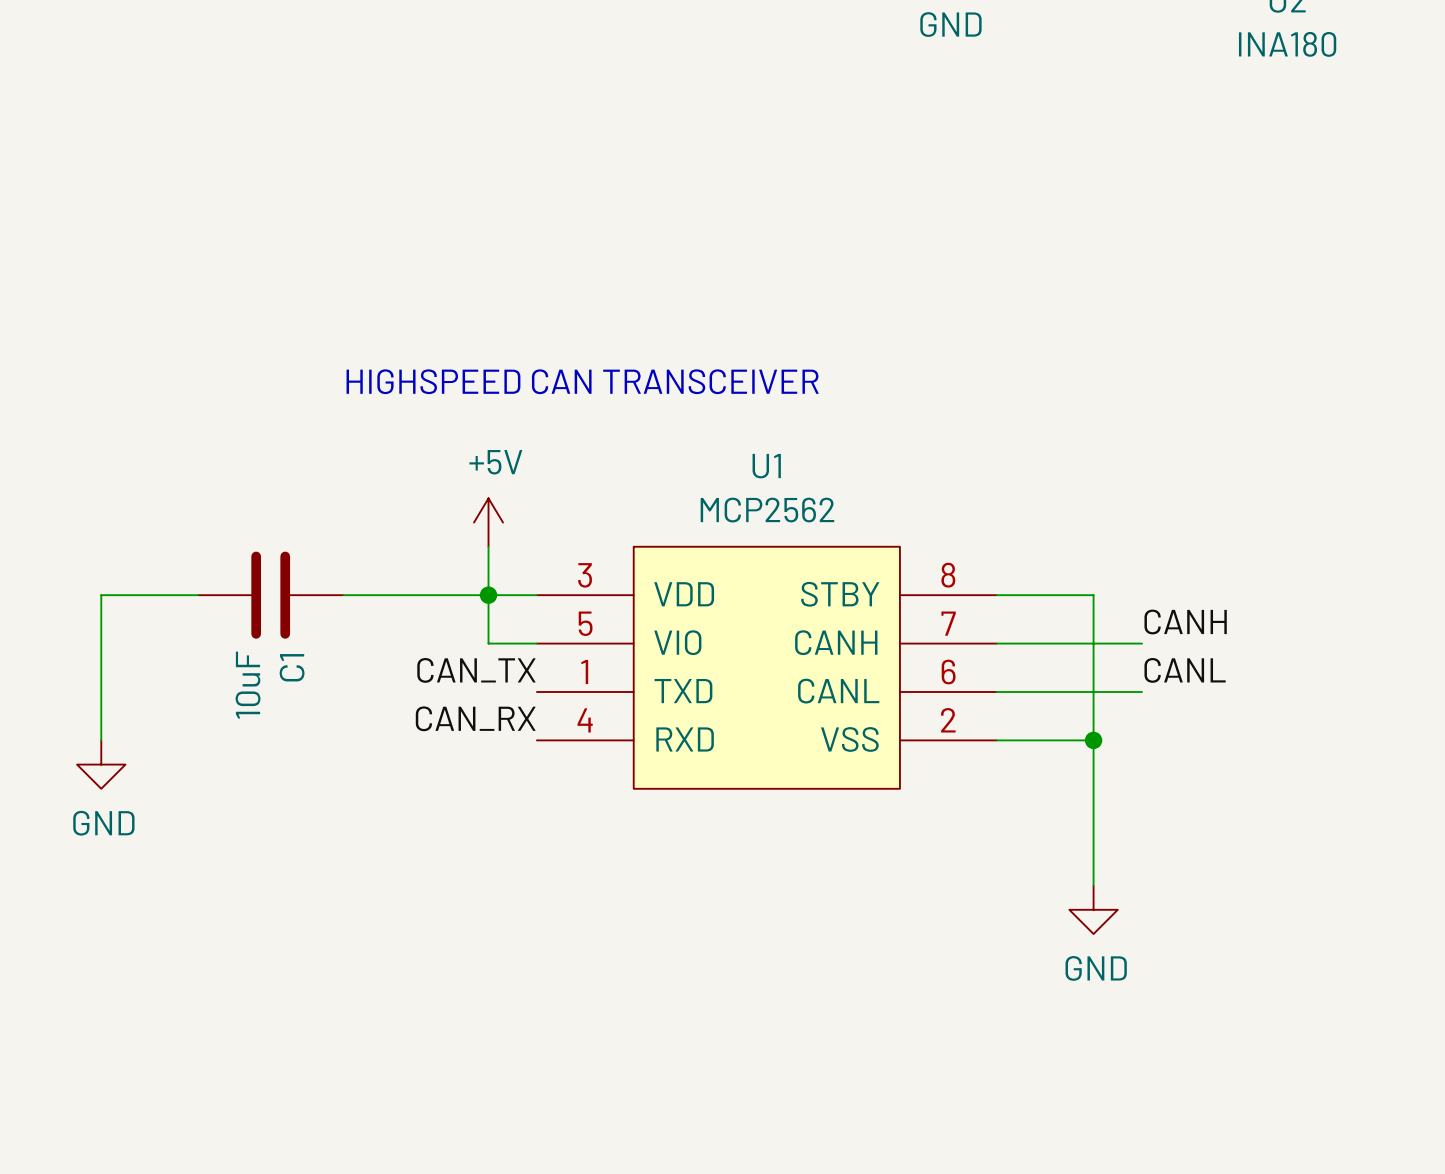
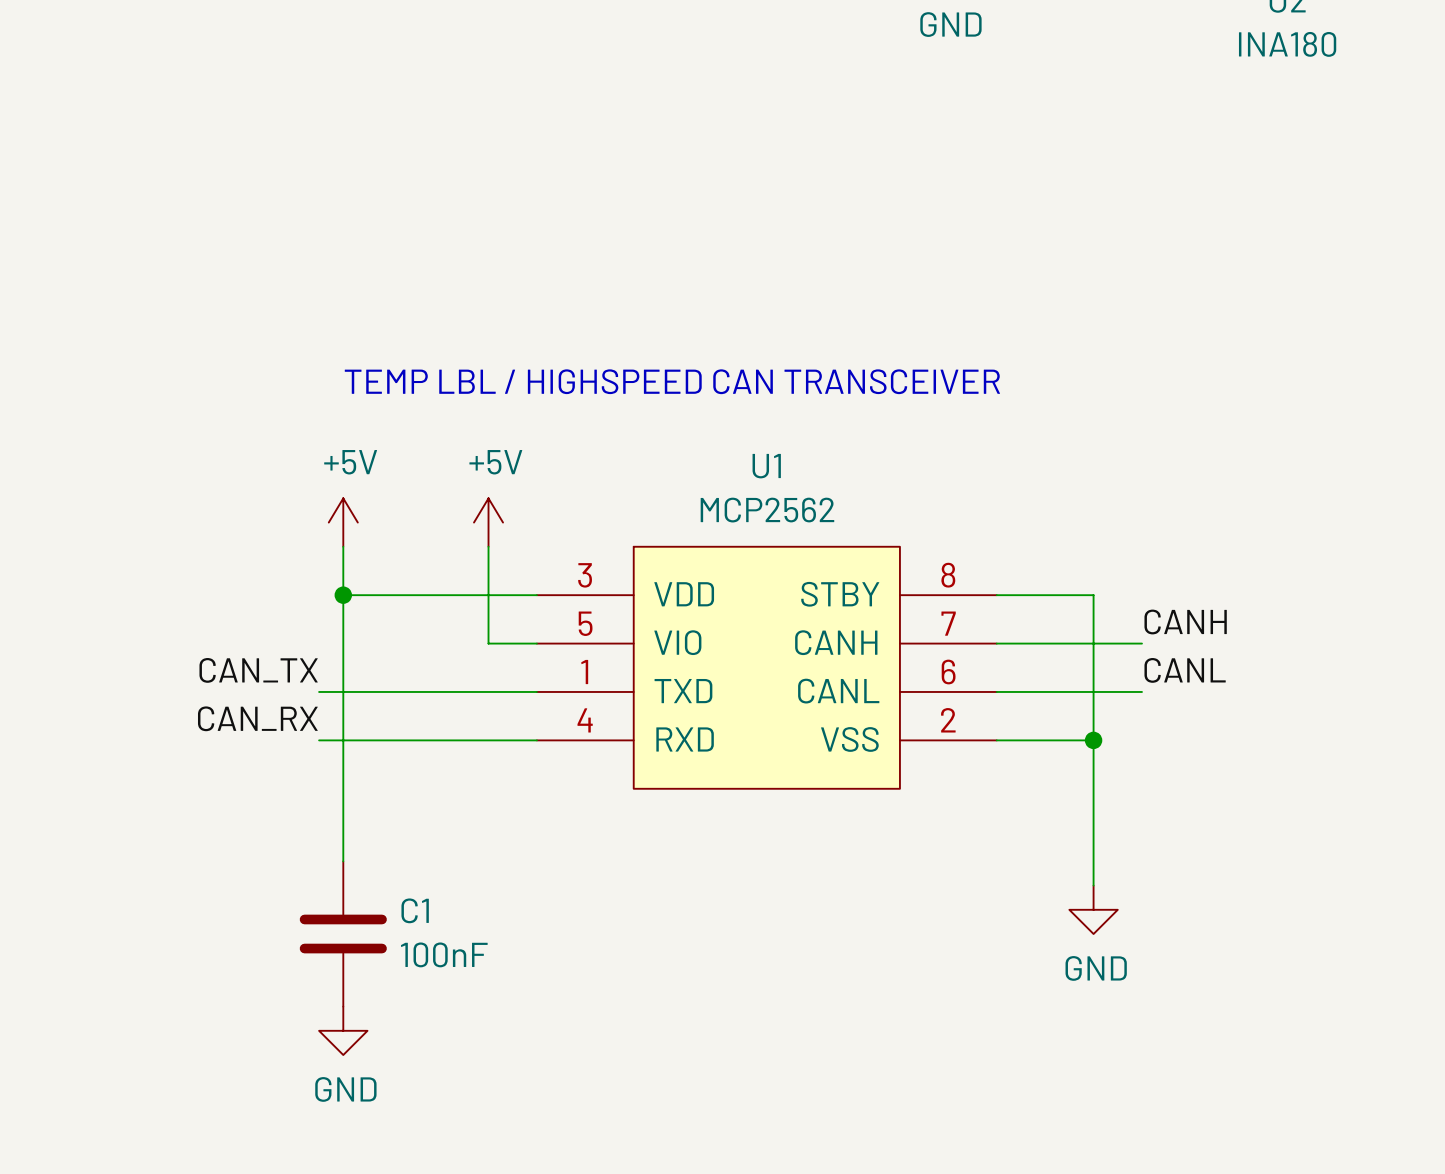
text: HIGHSPEED CAN TRANSCEIVER (582, 381) -> TEMP LBL / HIGHSPEED CAN TRANSCEIVER (672, 381)
power symbol: none -> +5V (343, 522)
wire: none -> (343, 546) (343, 861)
wire: (198, 595) (101, 595) (101, 740) -> none
C1 rotation: 0° (270, 595) -> 90° clockwise (343, 934)
C1 position: (270, 595) -> (343, 934)
junction: none -> (343, 595)
junction: (488, 595) -> none
C1 name position: C1 (292, 667) -> C1 (415, 910)
label position: CAN_TX (476, 670) -> CAN_TX (258, 670)
C1 value: 10uF (248, 685) -> 100nF (444, 954)
wire: none -> (319, 691) (536, 691)
label position: CAN_RX (475, 718) -> CAN_RX (257, 718)
wire: none -> (319, 740) (536, 740)
power symbol position: GND (101, 764) -> GND (343, 1030)

